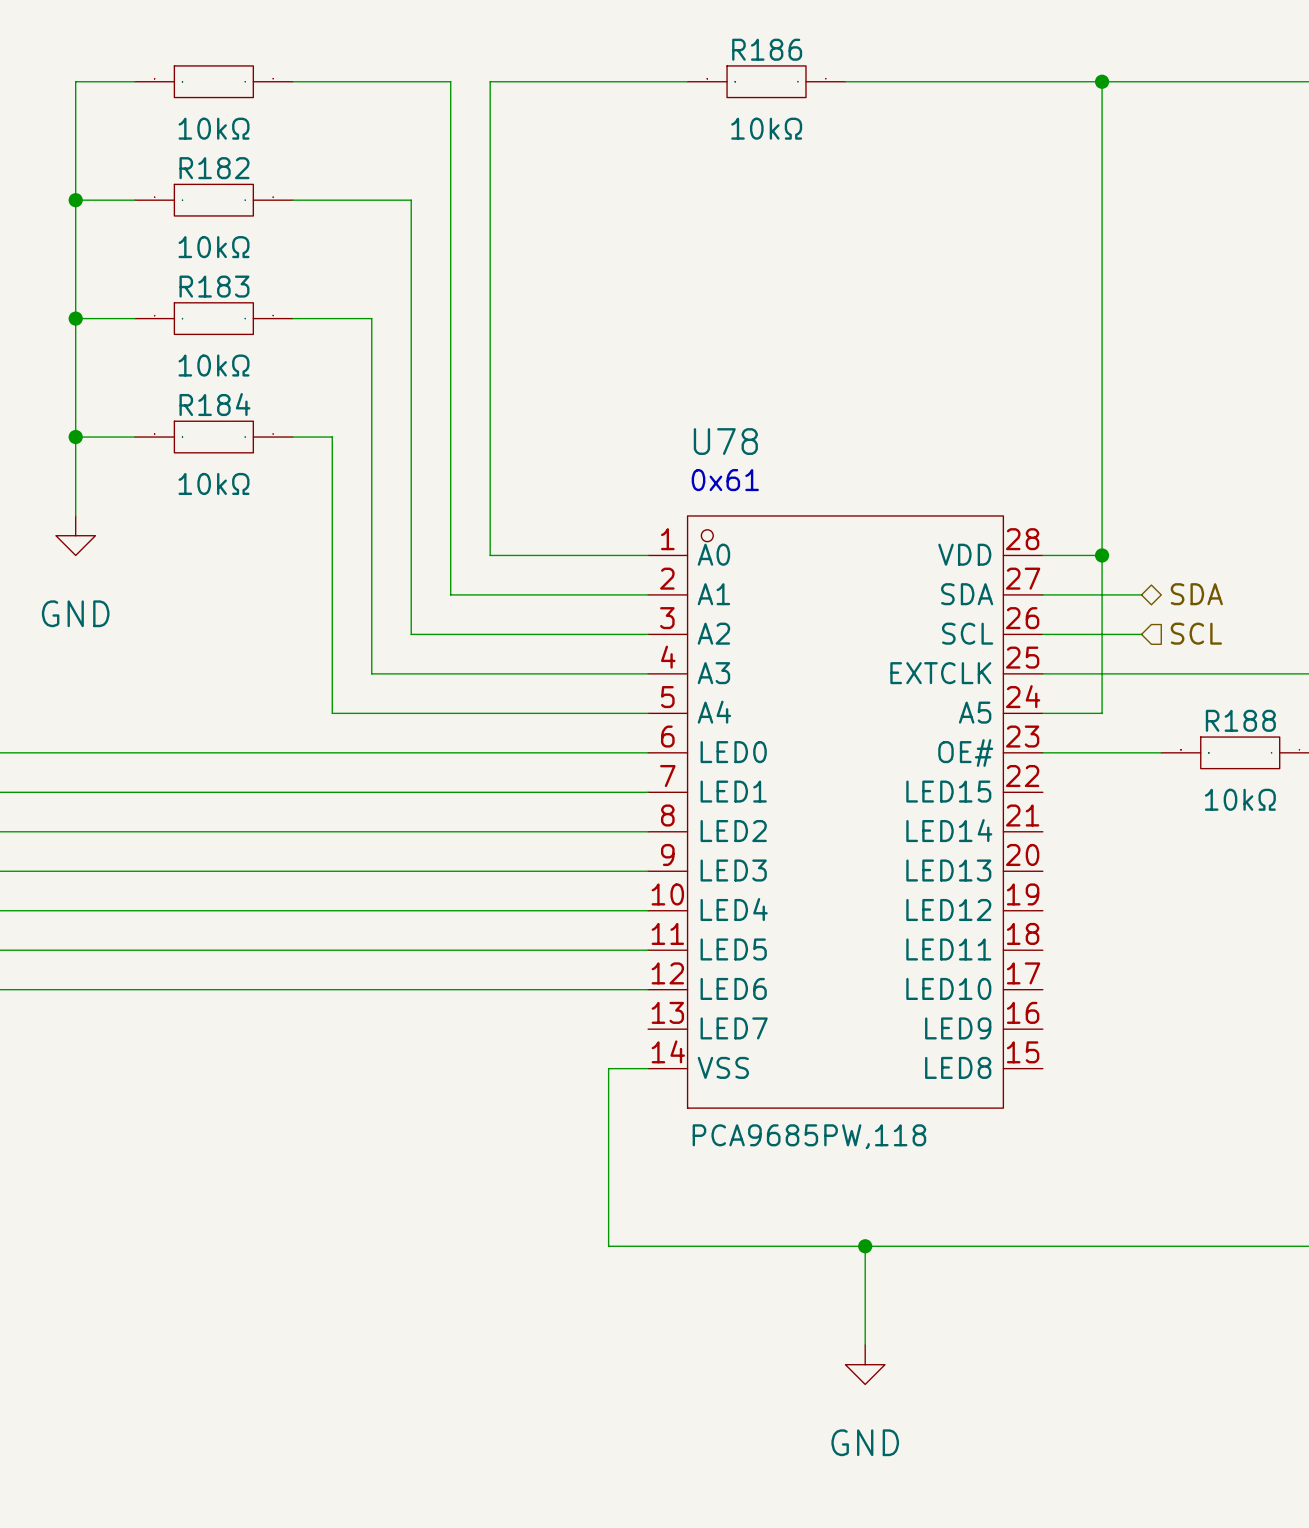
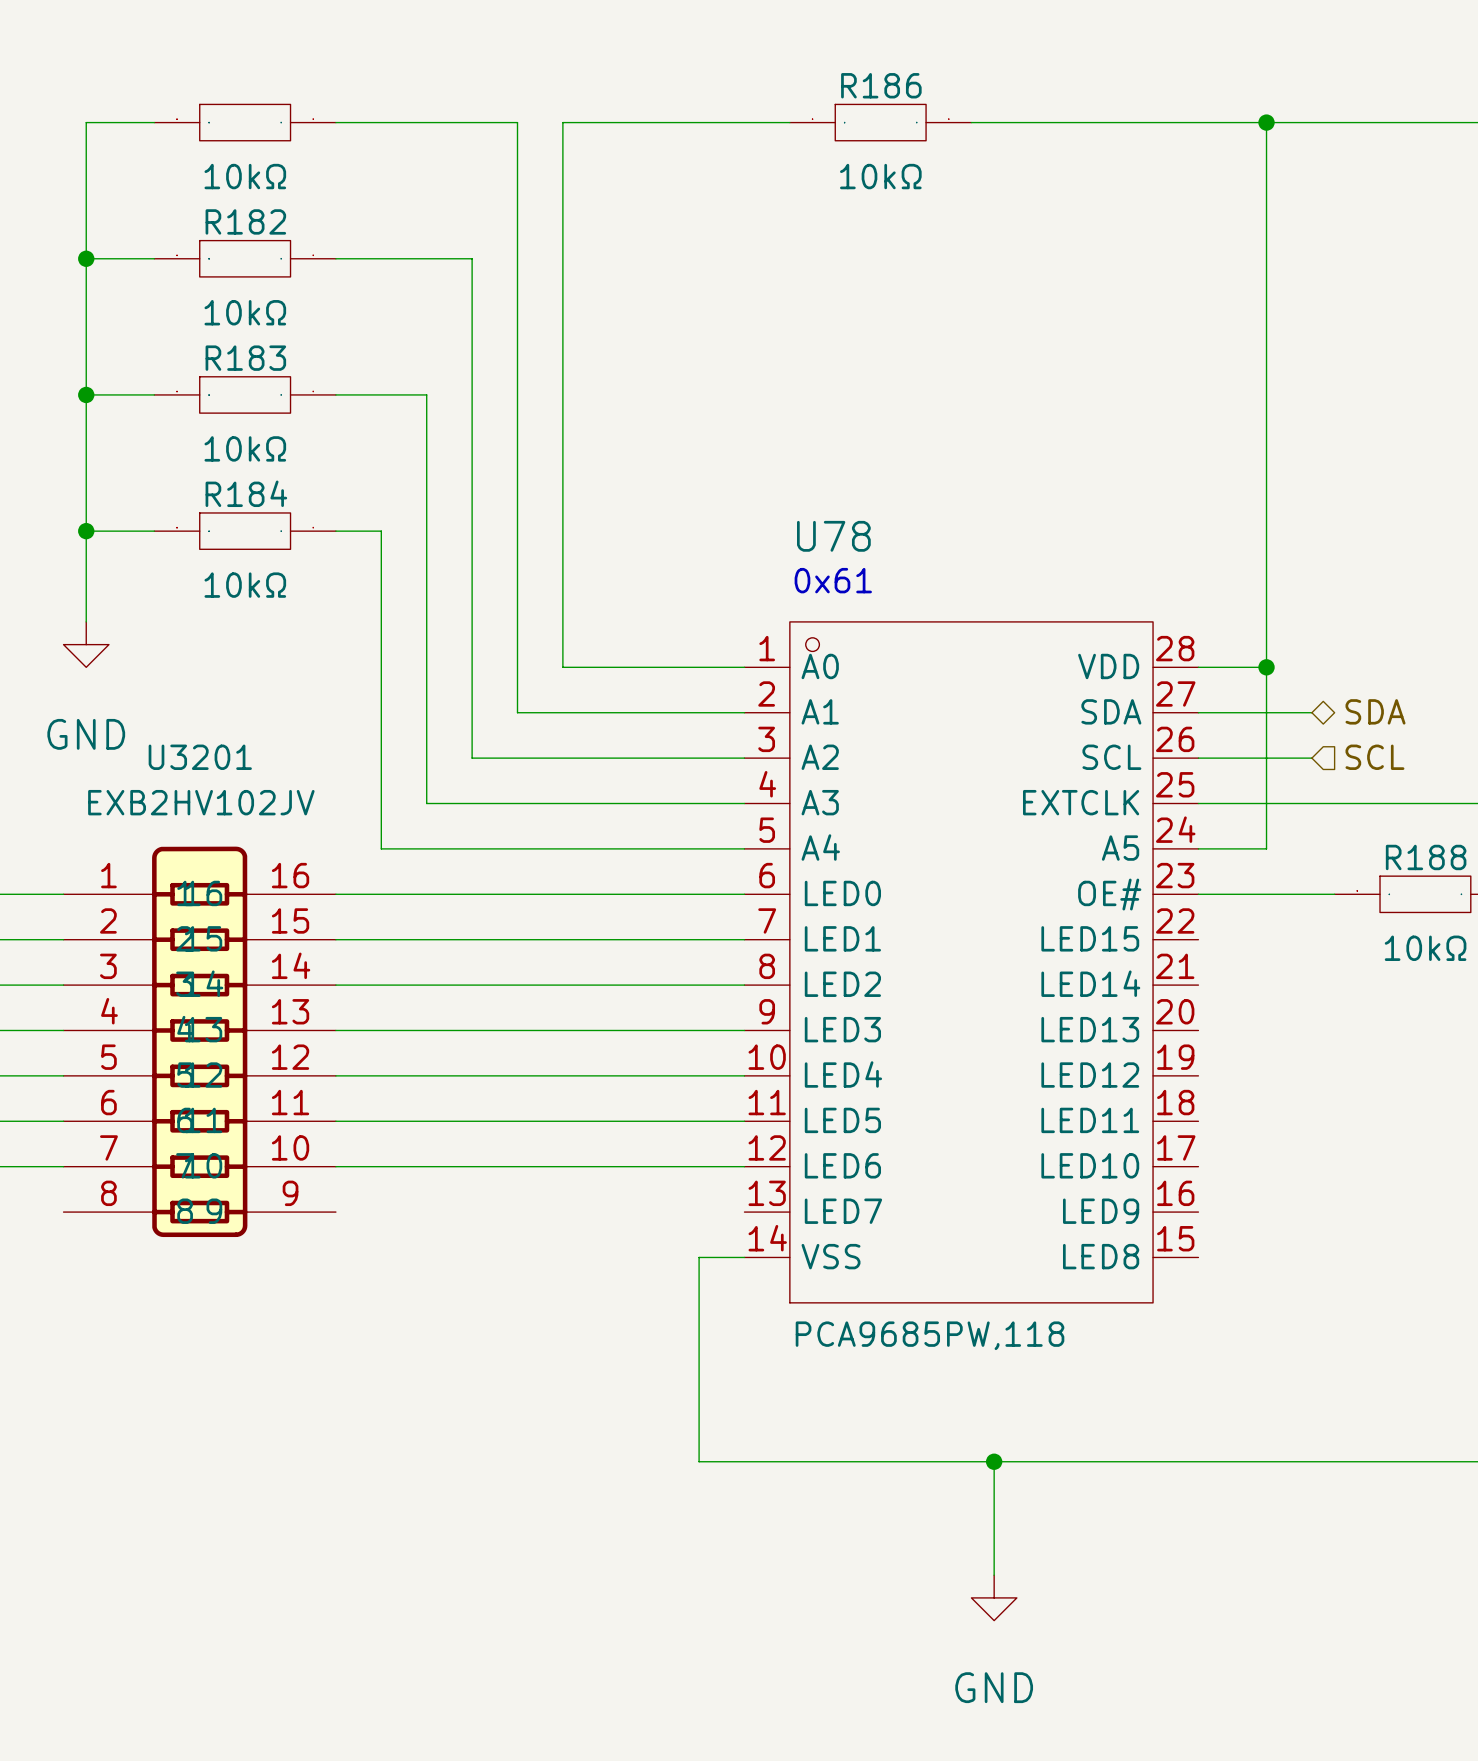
U3201: none -> EXB2HV102JV (199, 1041)

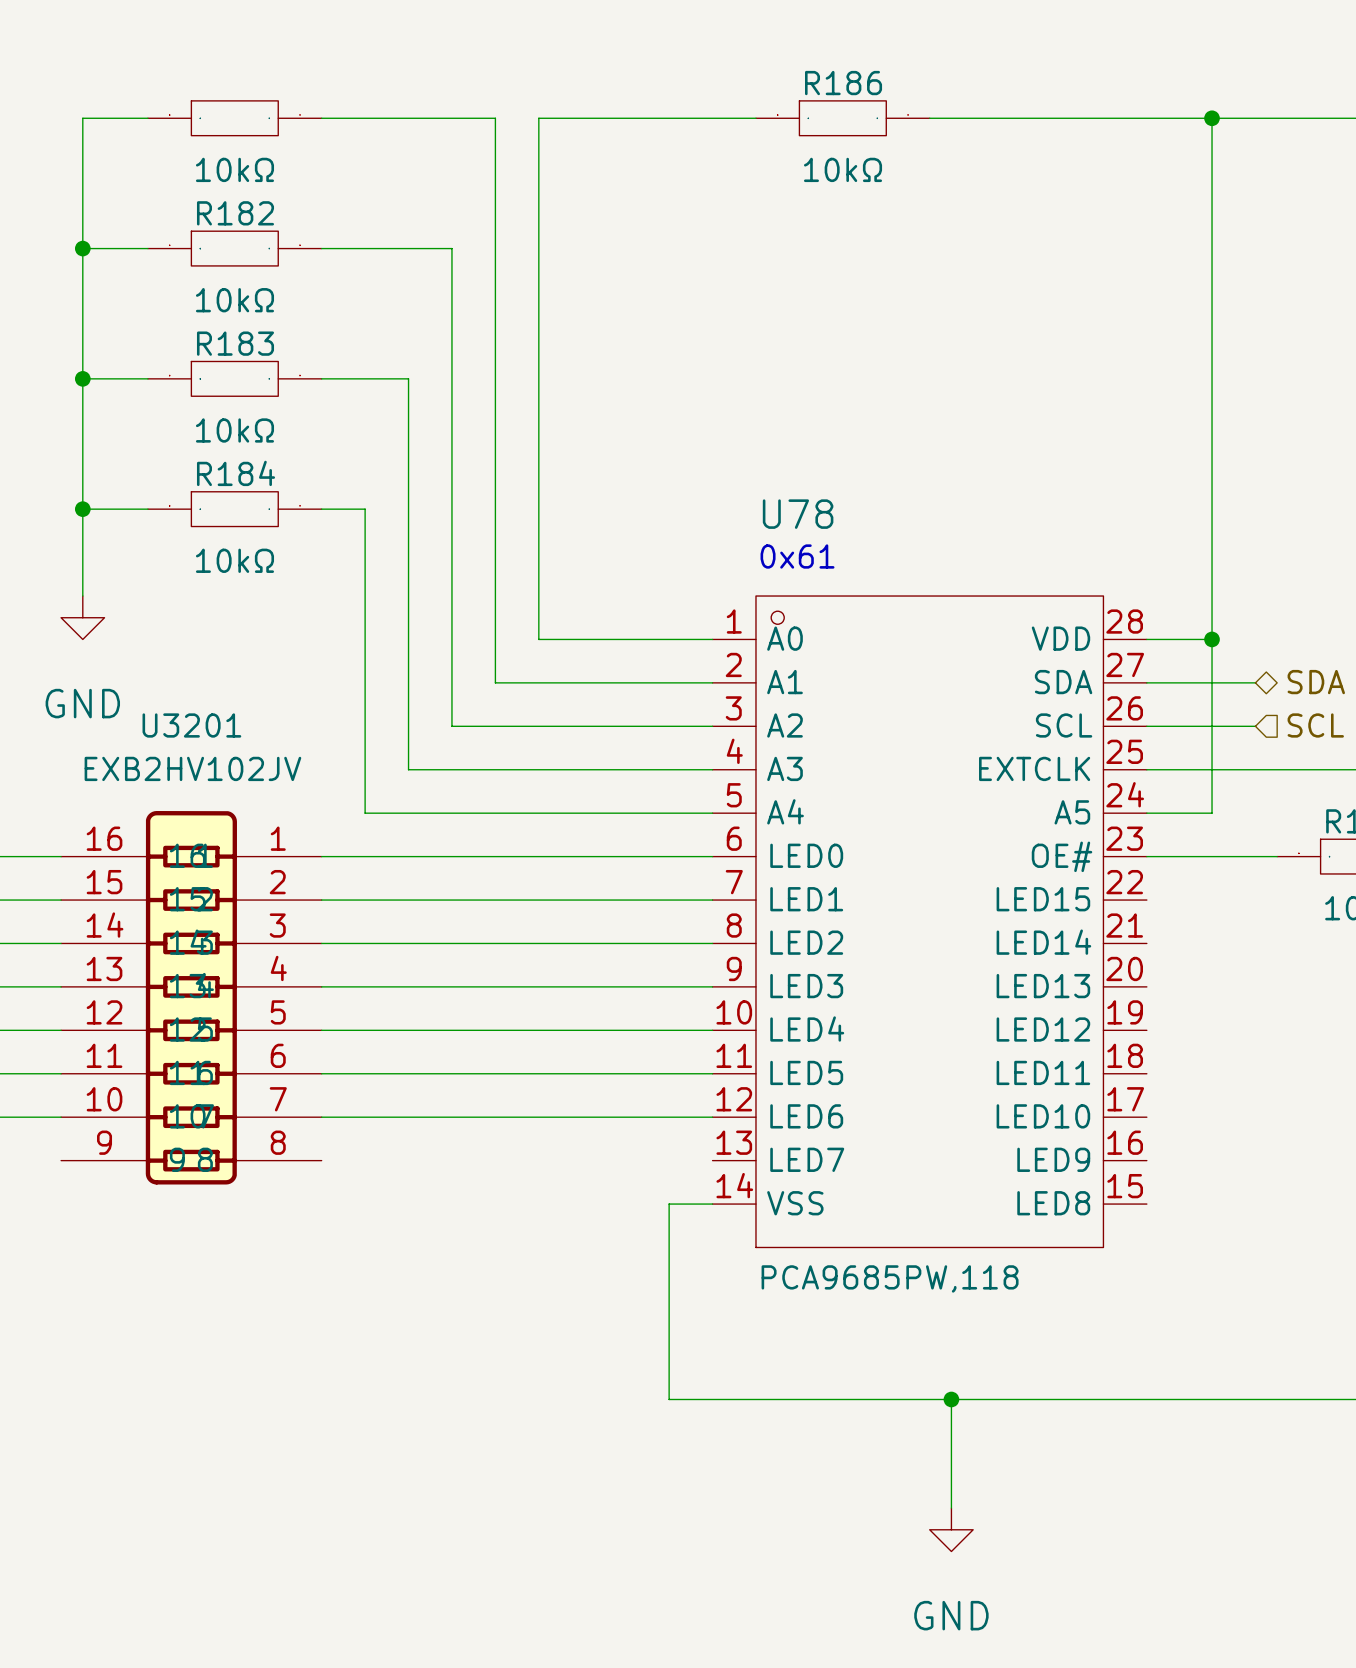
U3201 flip: as is (199, 1041) -> left-right (191, 997)

